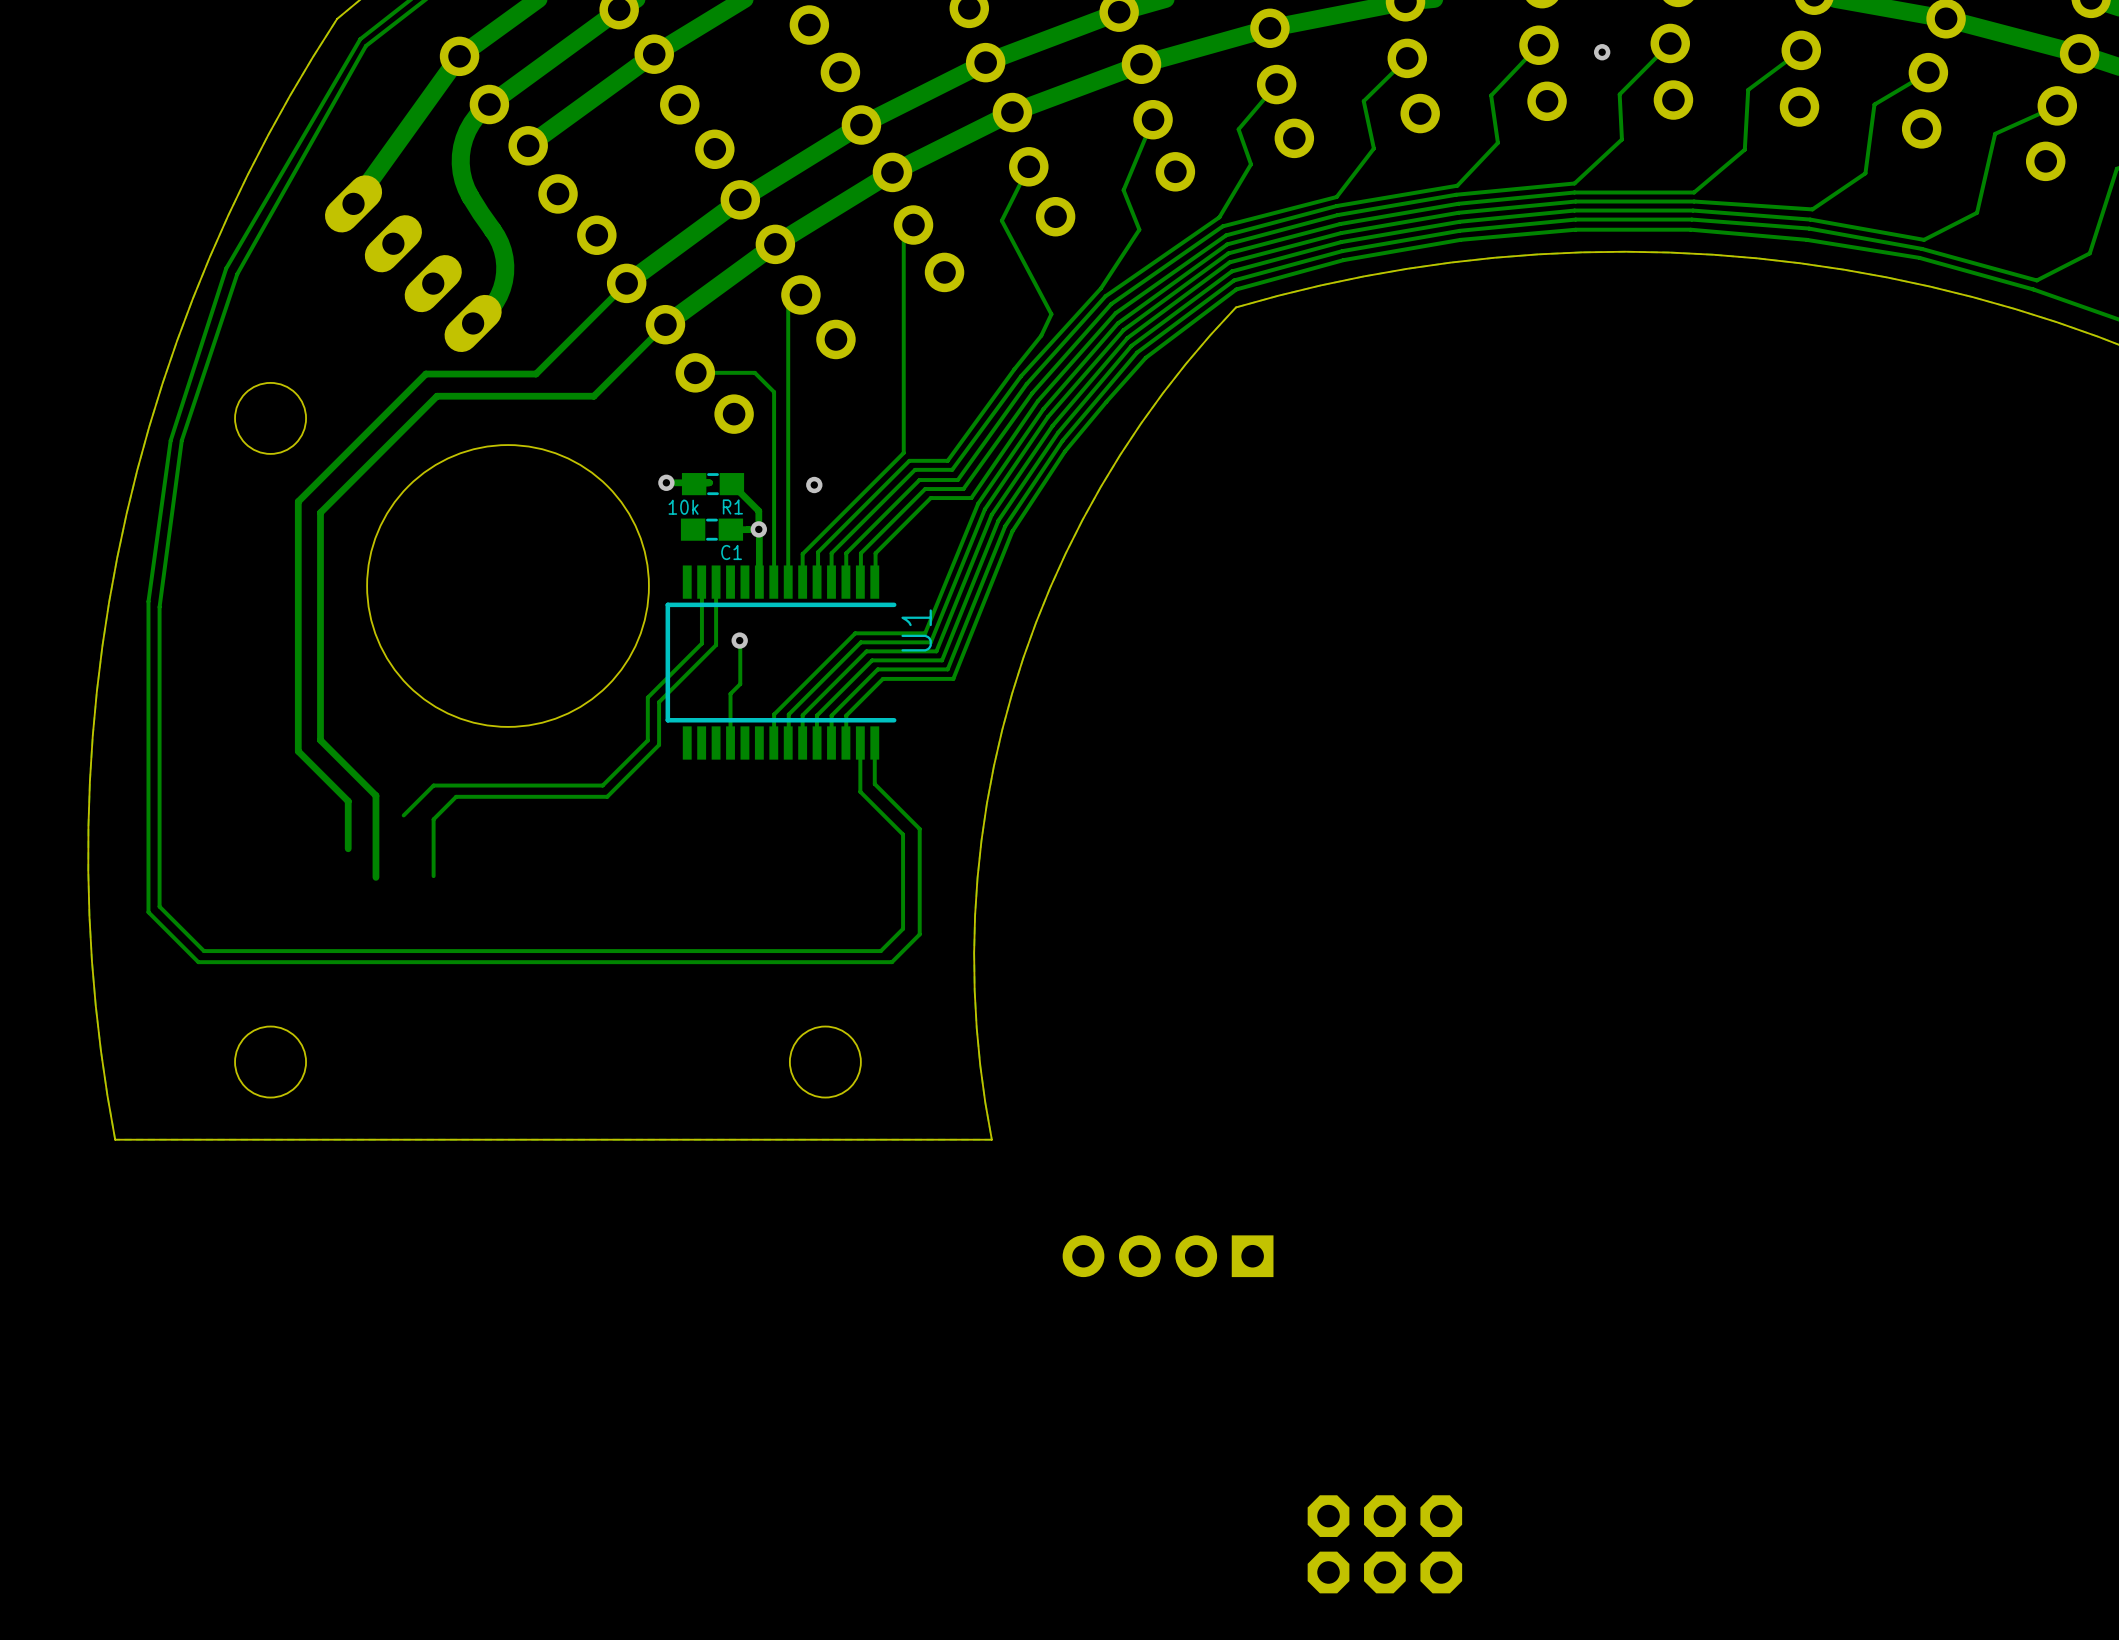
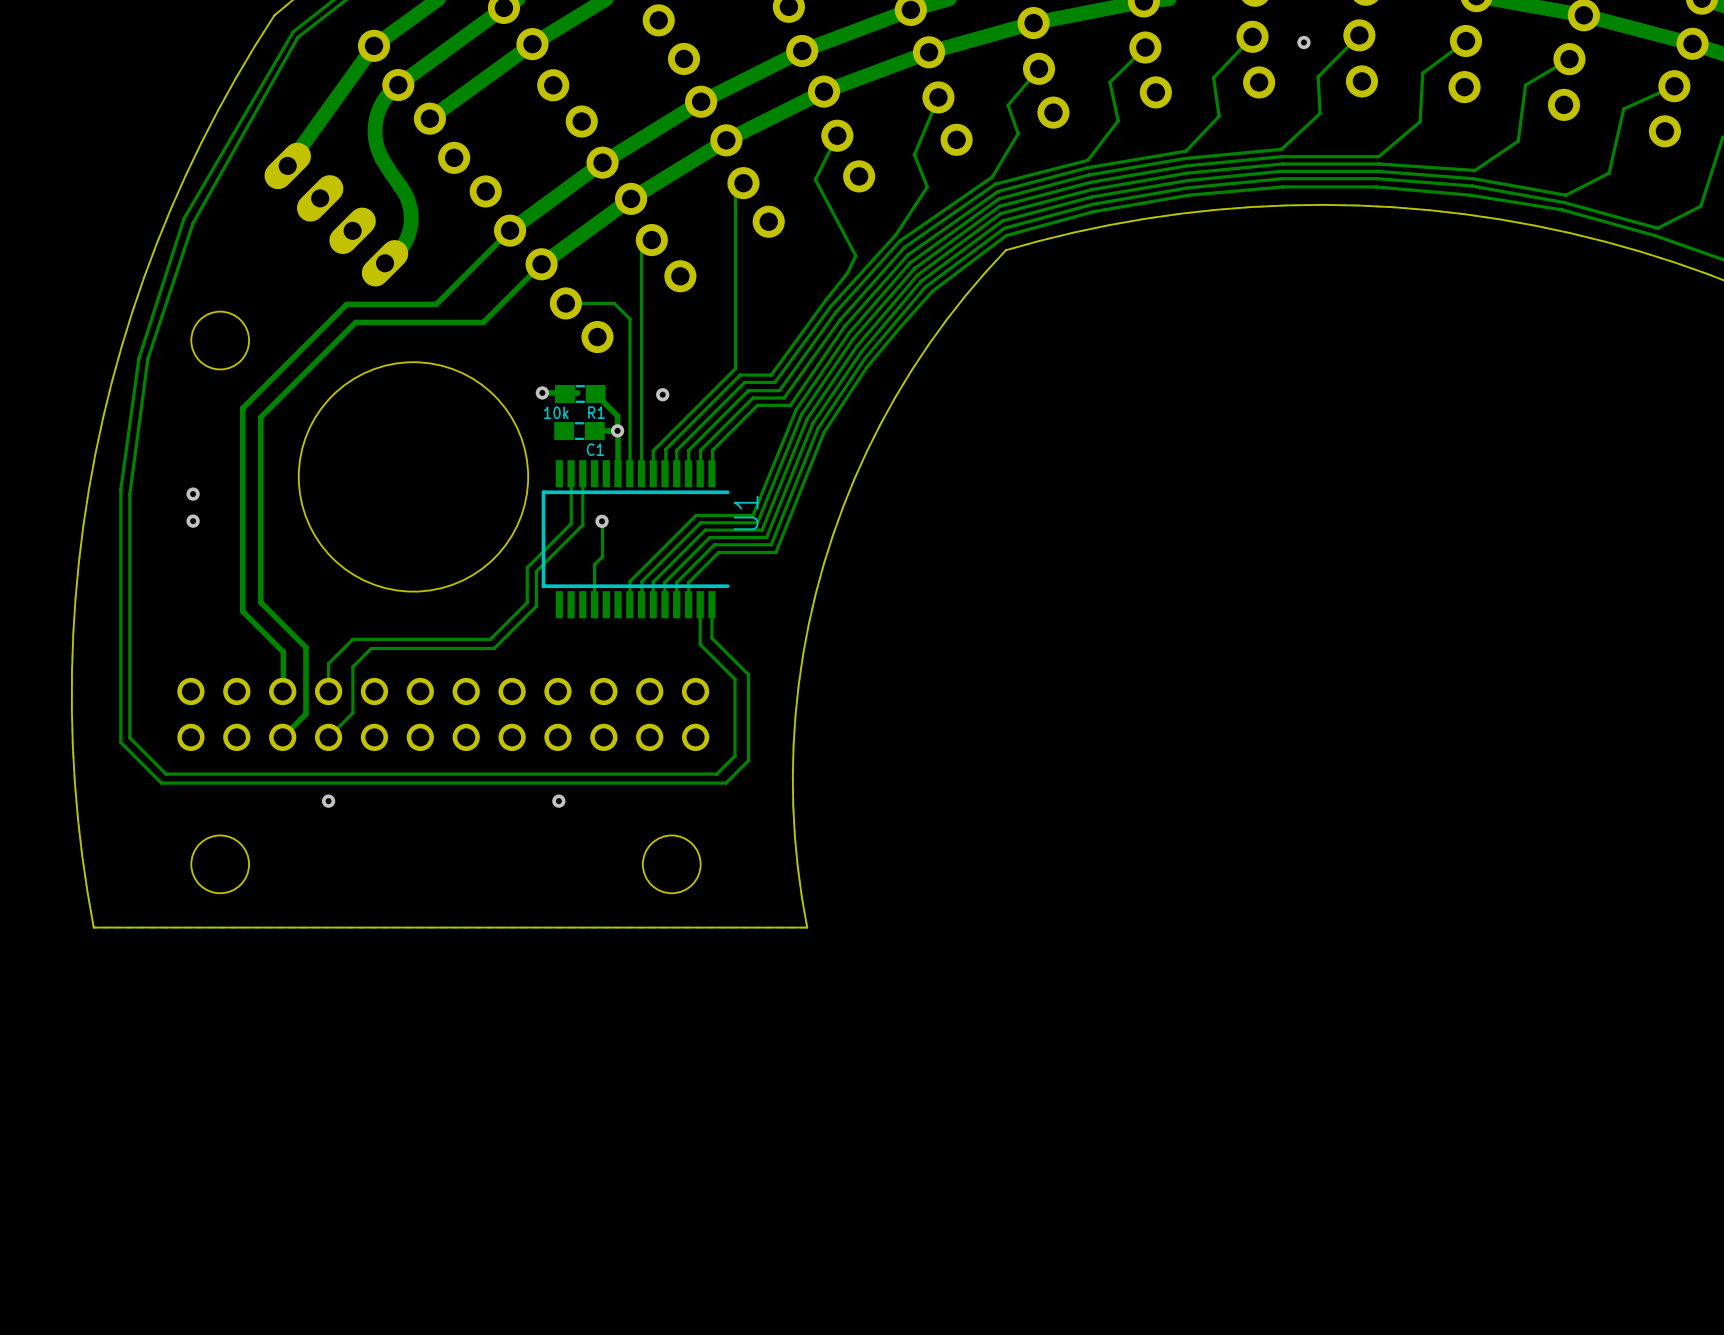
via: none -> (193, 494)
via: none -> (193, 521)
track: none -> (328, 663) (328, 691)
track: none -> (352, 713) (328, 737)
track: none -> (305, 714) (282, 737)
part: none -> (443, 714)
via: none -> (328, 801)
via: none -> (558, 801)
part: (1168, 1256) -> none
part: (1384, 1544) -> none

